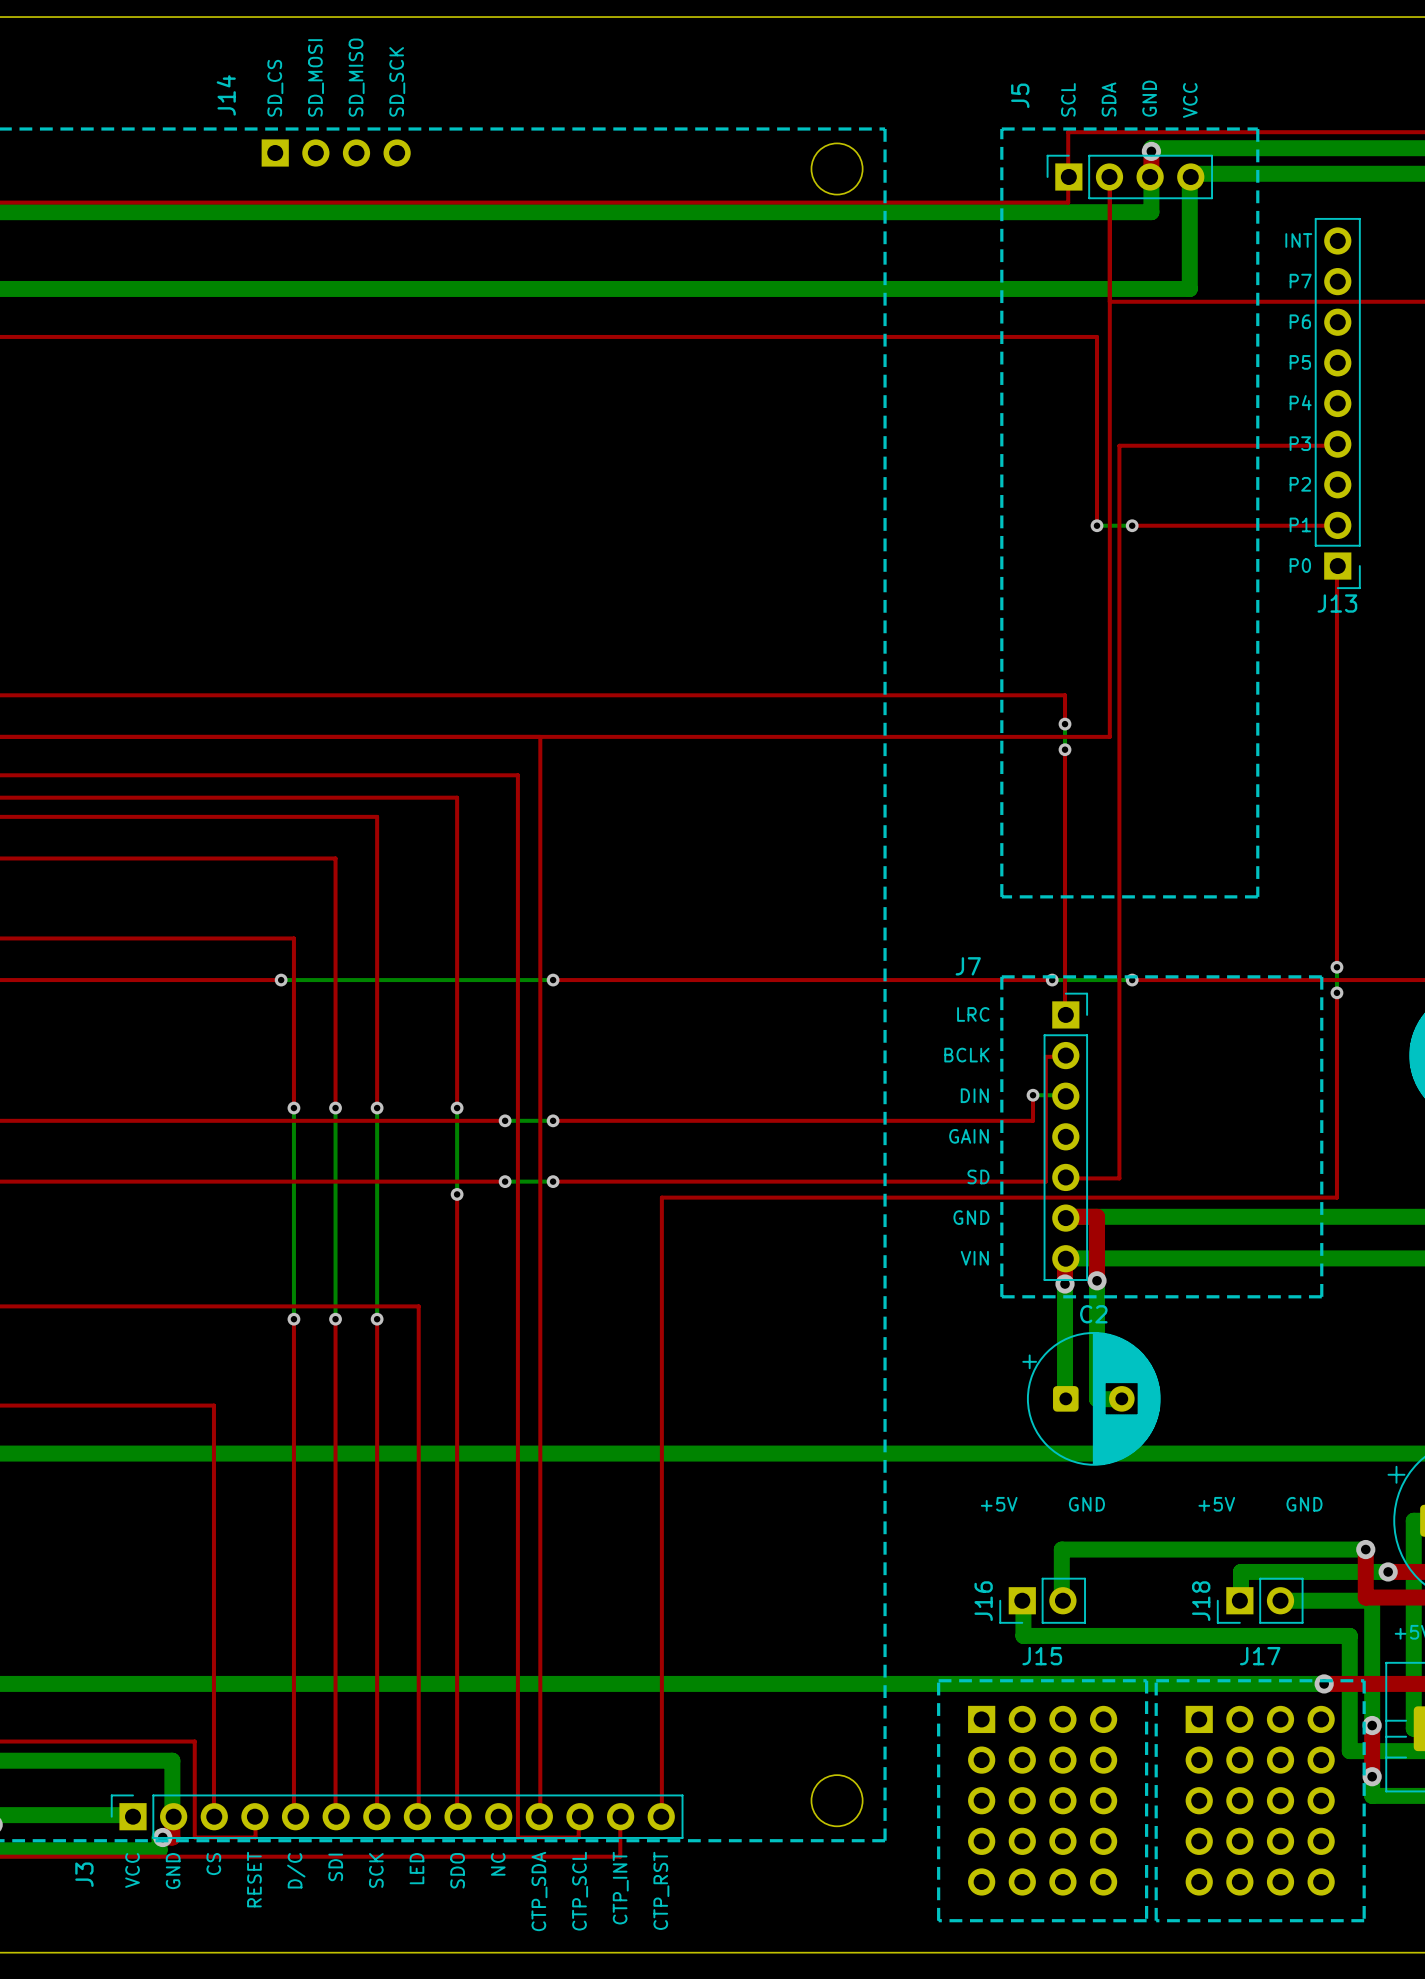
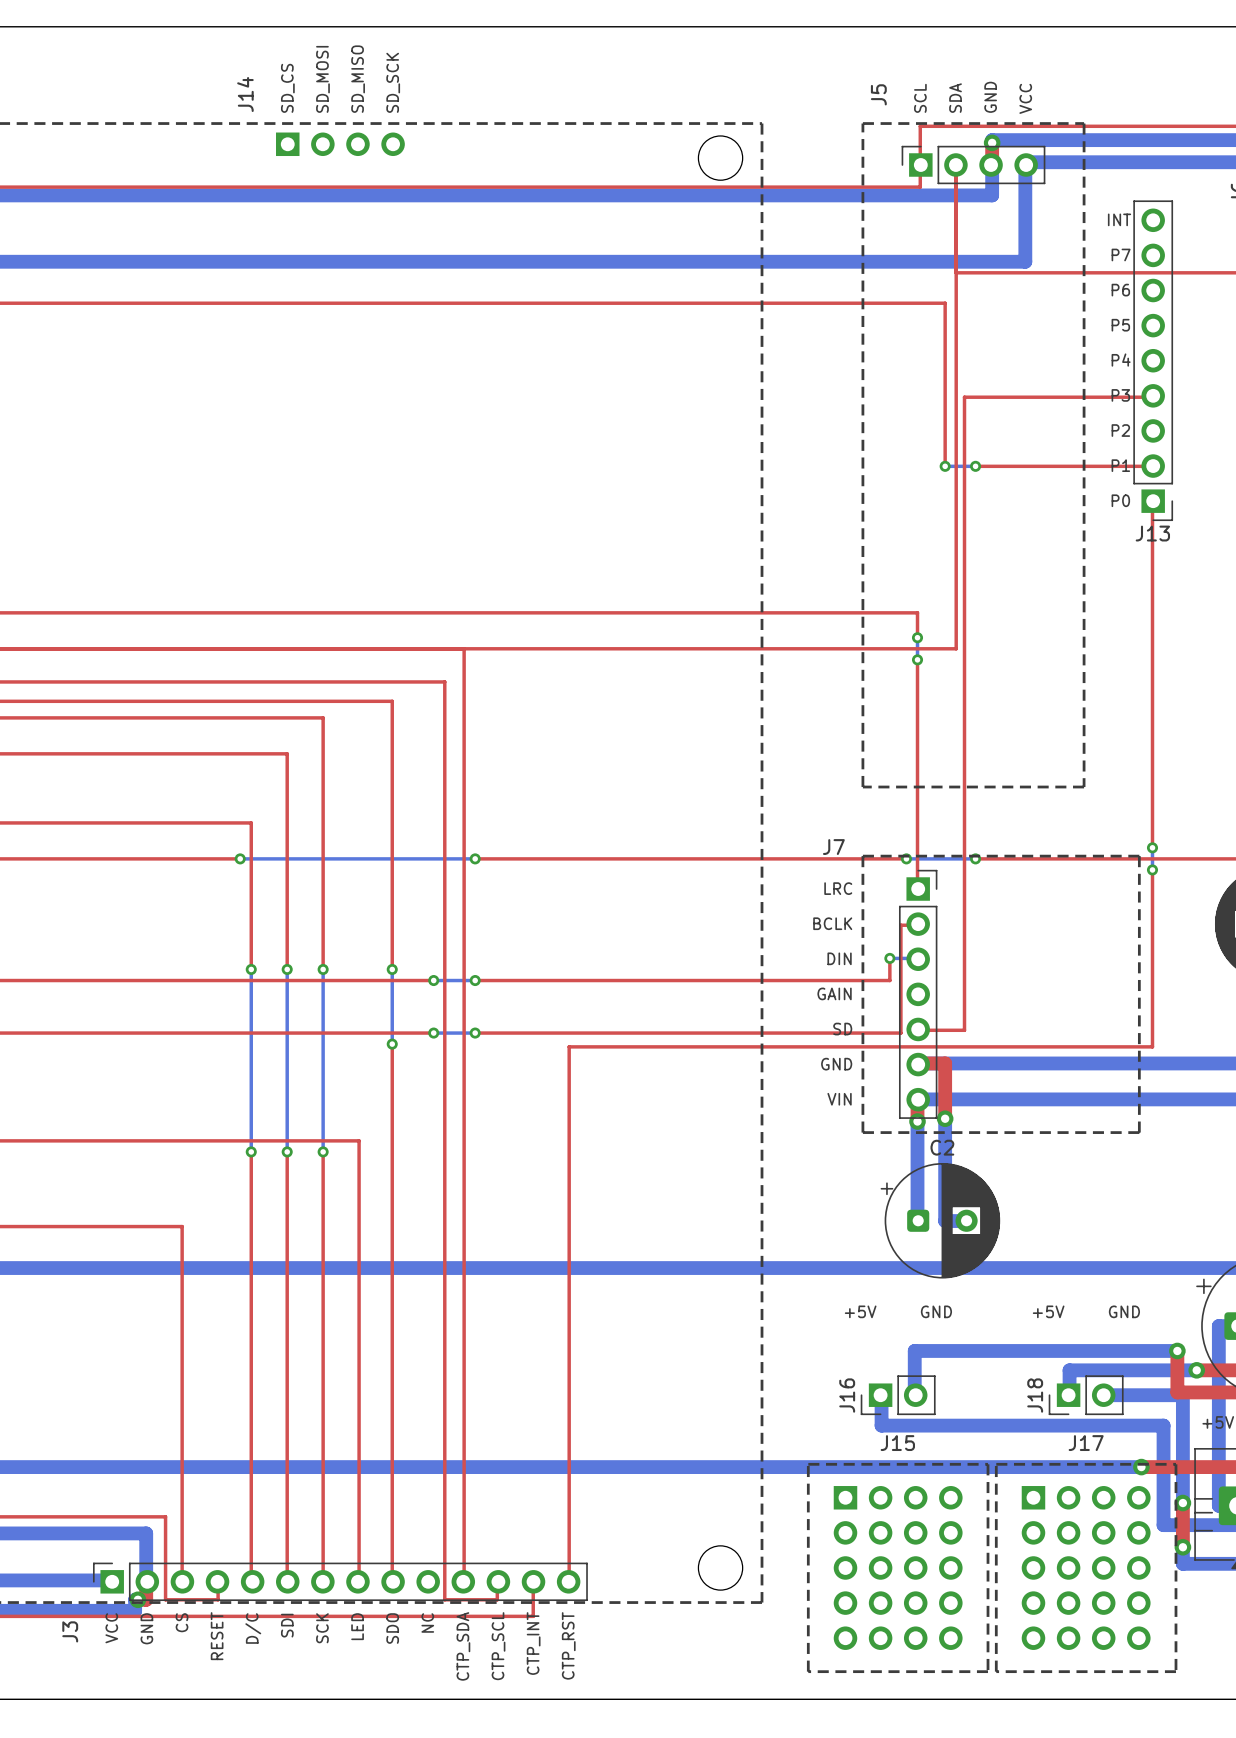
text position: SD_MOSI (315, 77) -> SD_MOSI (322, 79)
text position: SD_MISO (356, 77) -> SD_MISO (358, 79)
text position: SD_SCK (397, 81) -> SD_SCK (393, 82)
text position: SD_CS (275, 88) -> SD_CS (287, 88)
J14 position: (336, 152) -> (340, 144)

